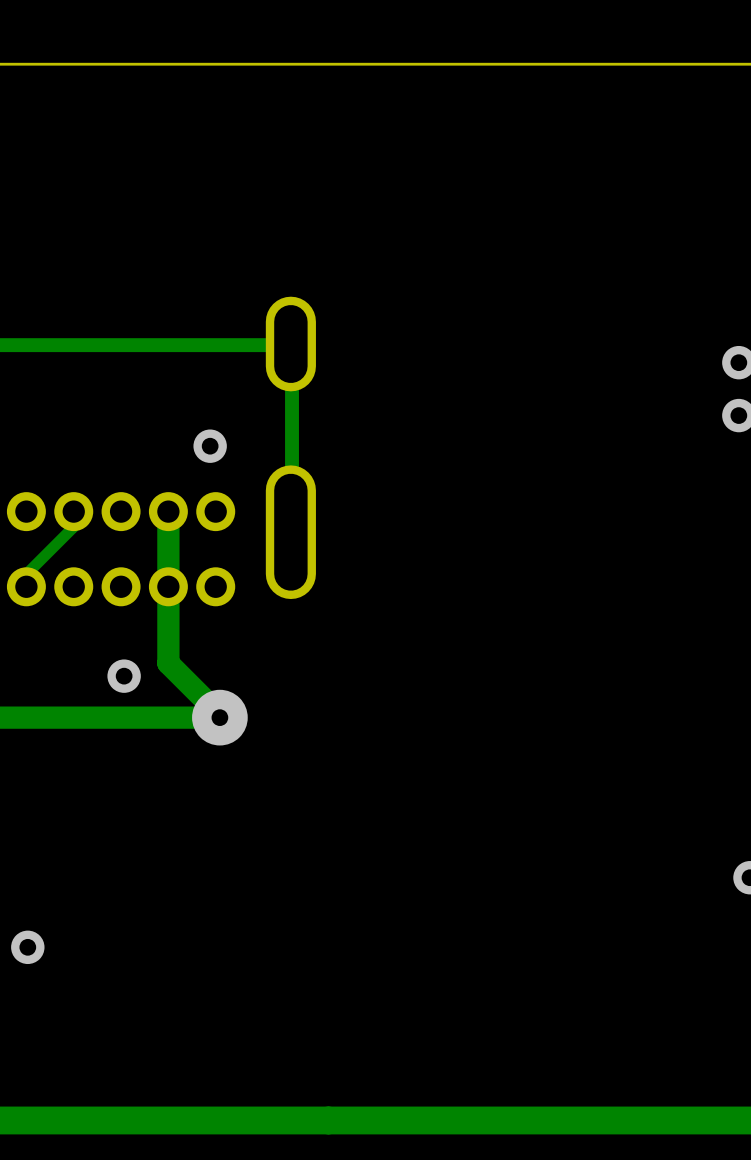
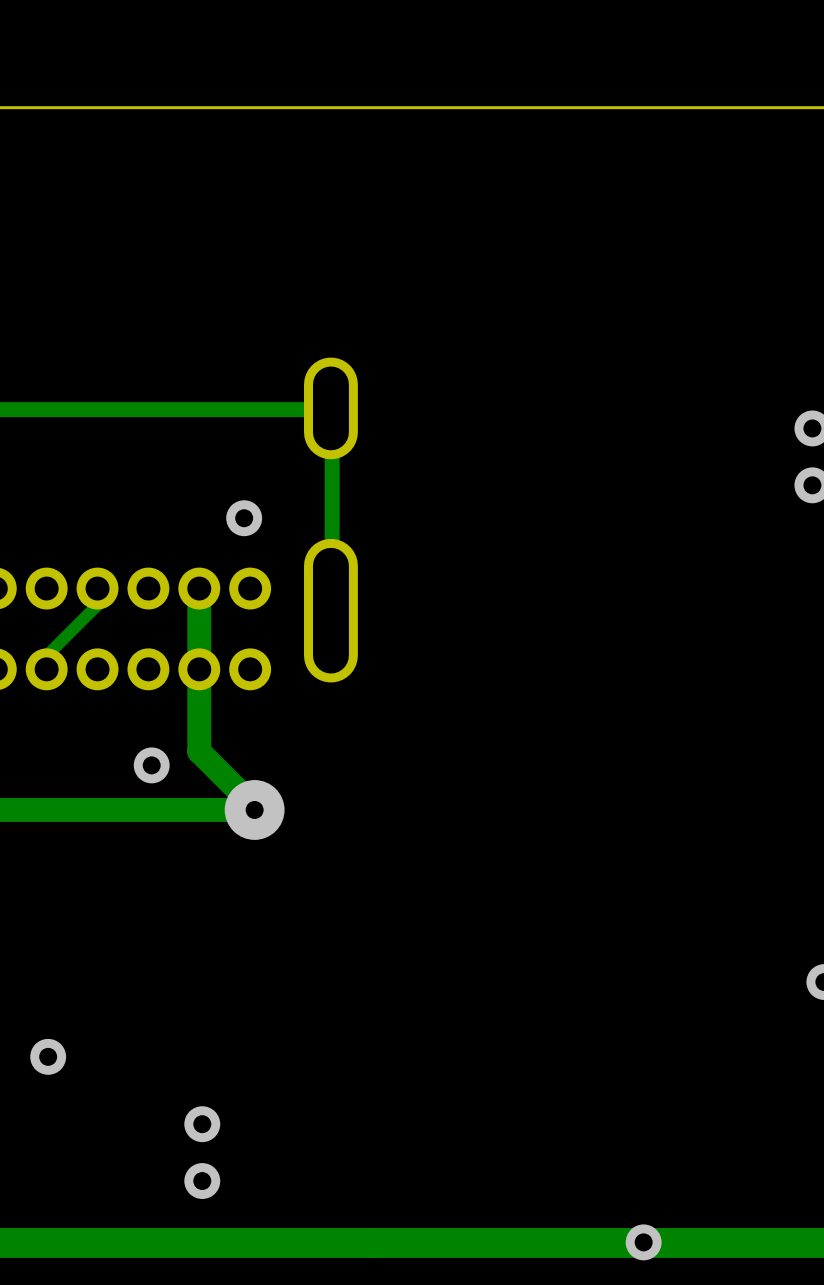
via: none -> (202, 1124)
via: none -> (202, 1181)
via: none -> (643, 1242)

